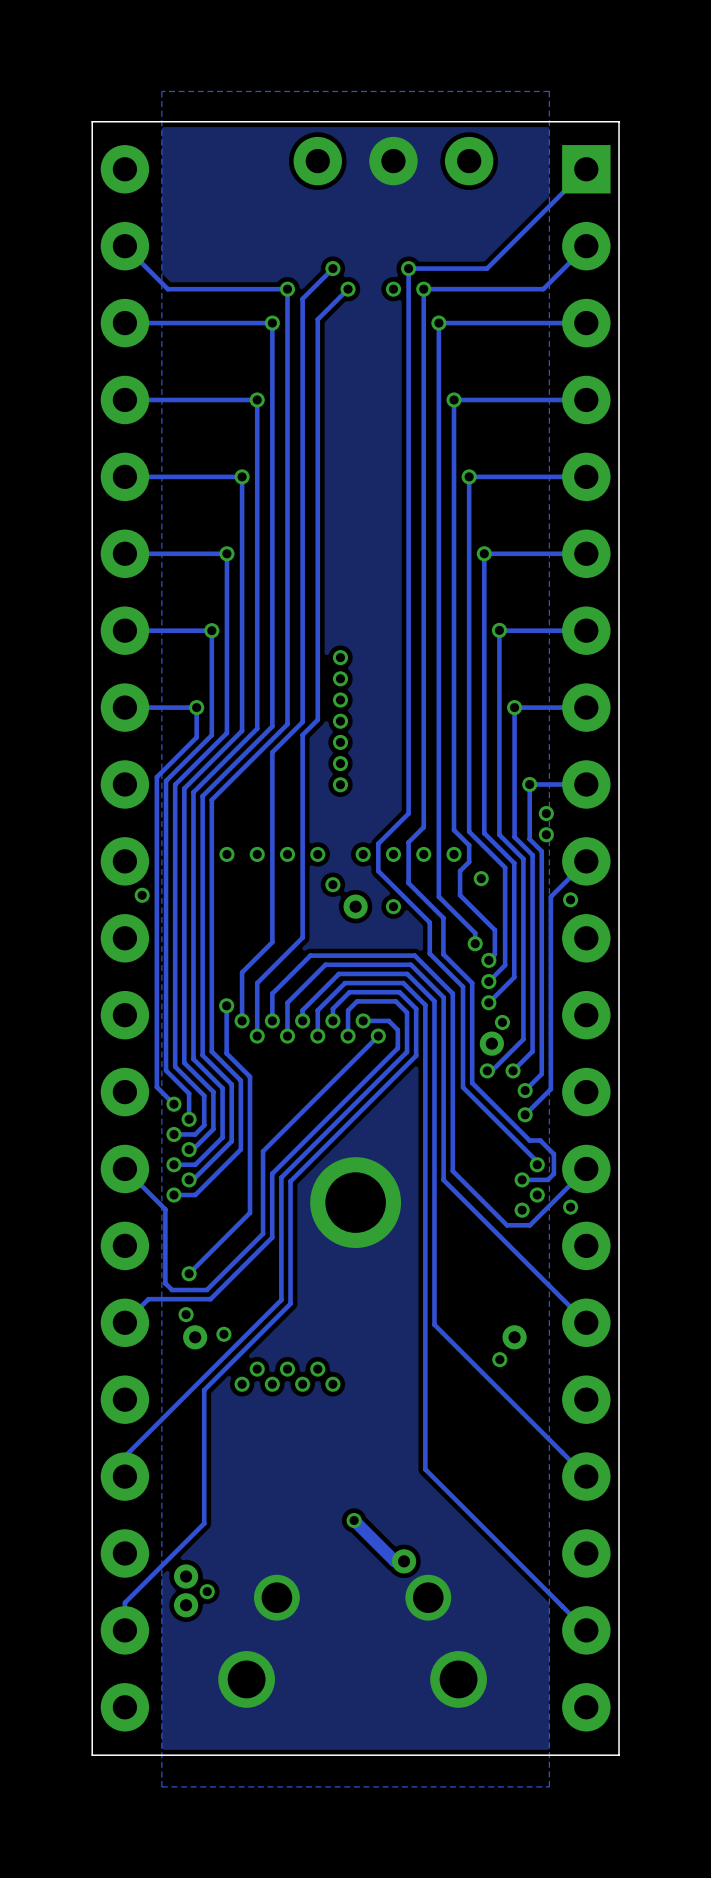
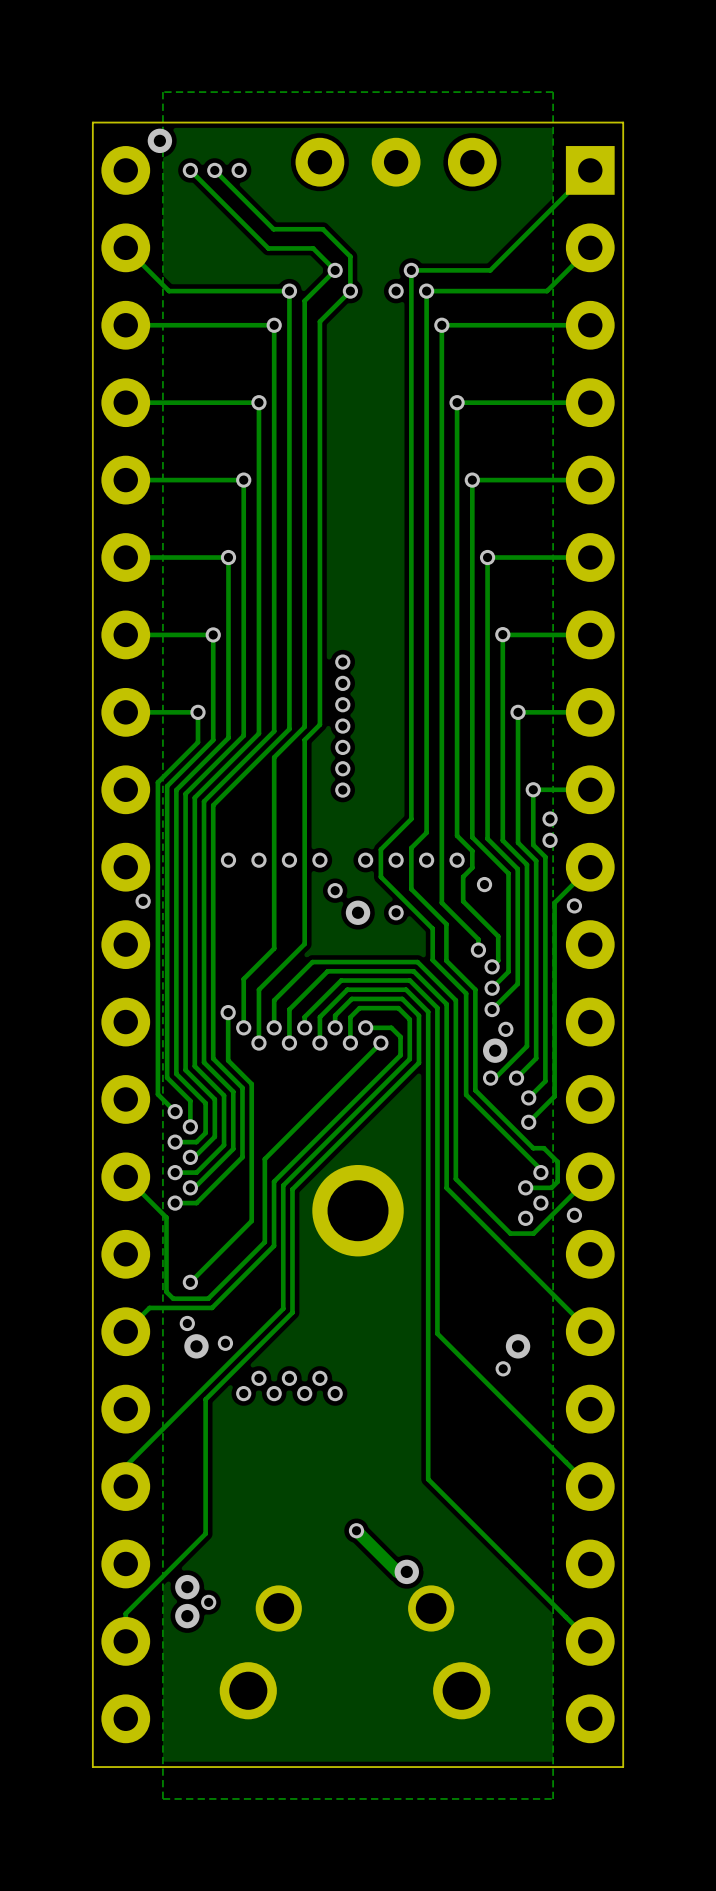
via: none -> (159, 140)
track: none -> (190, 170) (268, 248) (313, 248) (335, 270)
via: none -> (190, 170)
track: none -> (214, 170) (273, 229) (322, 229) (350, 256) (350, 291)
via: none -> (214, 170)
via: none -> (239, 170)

